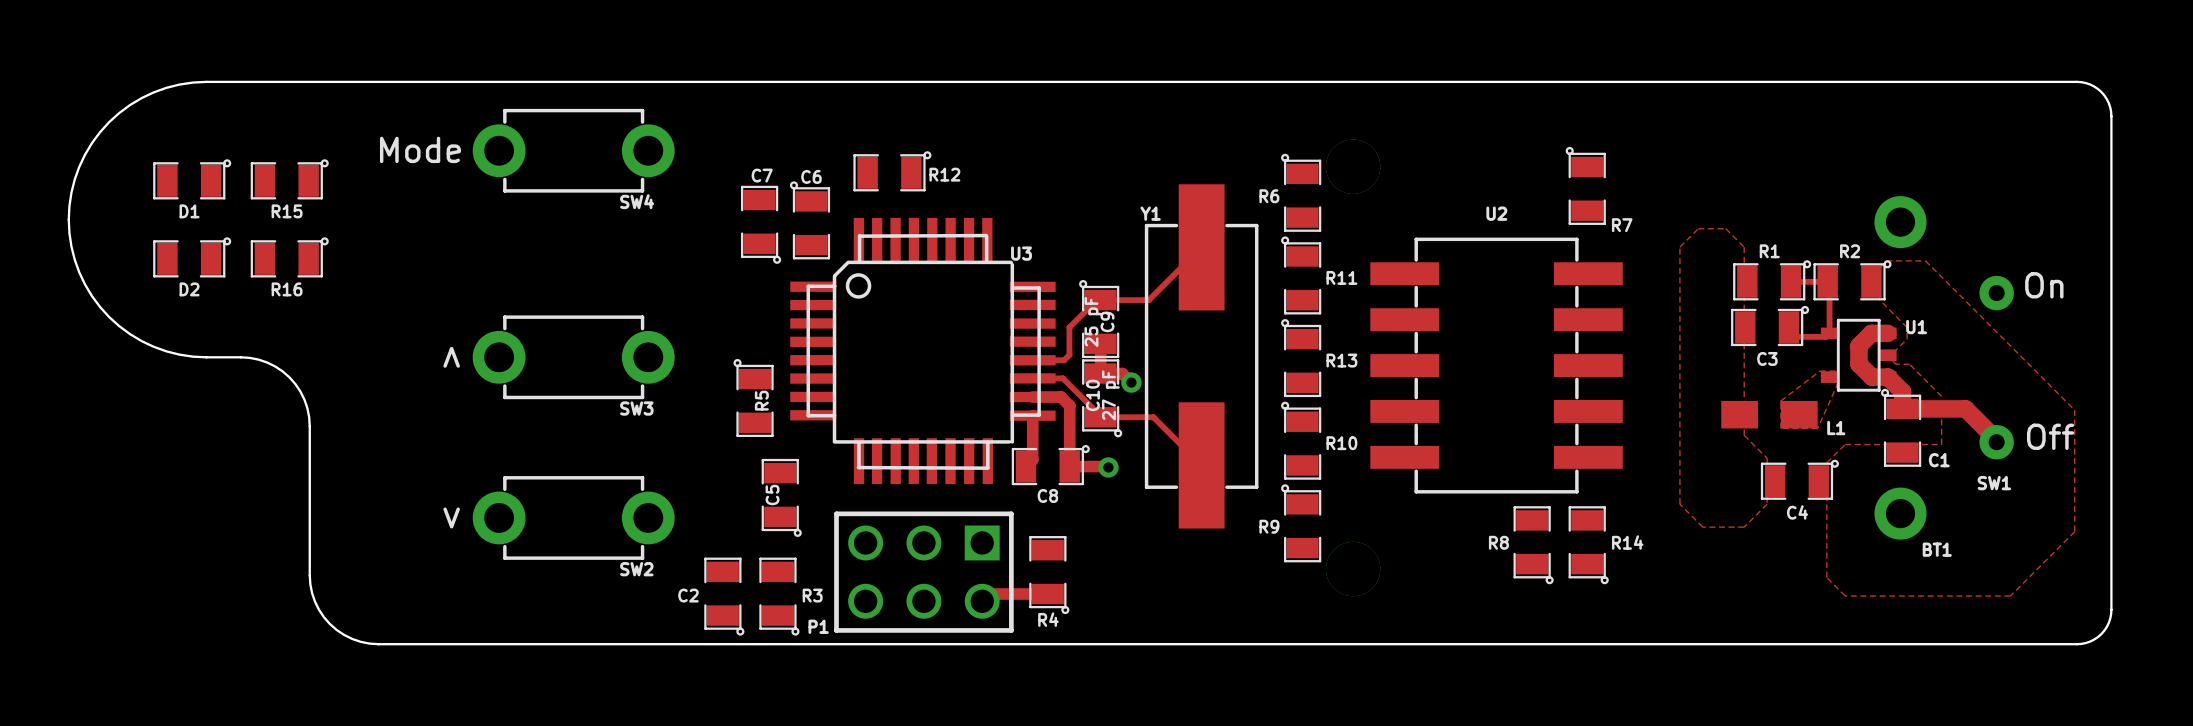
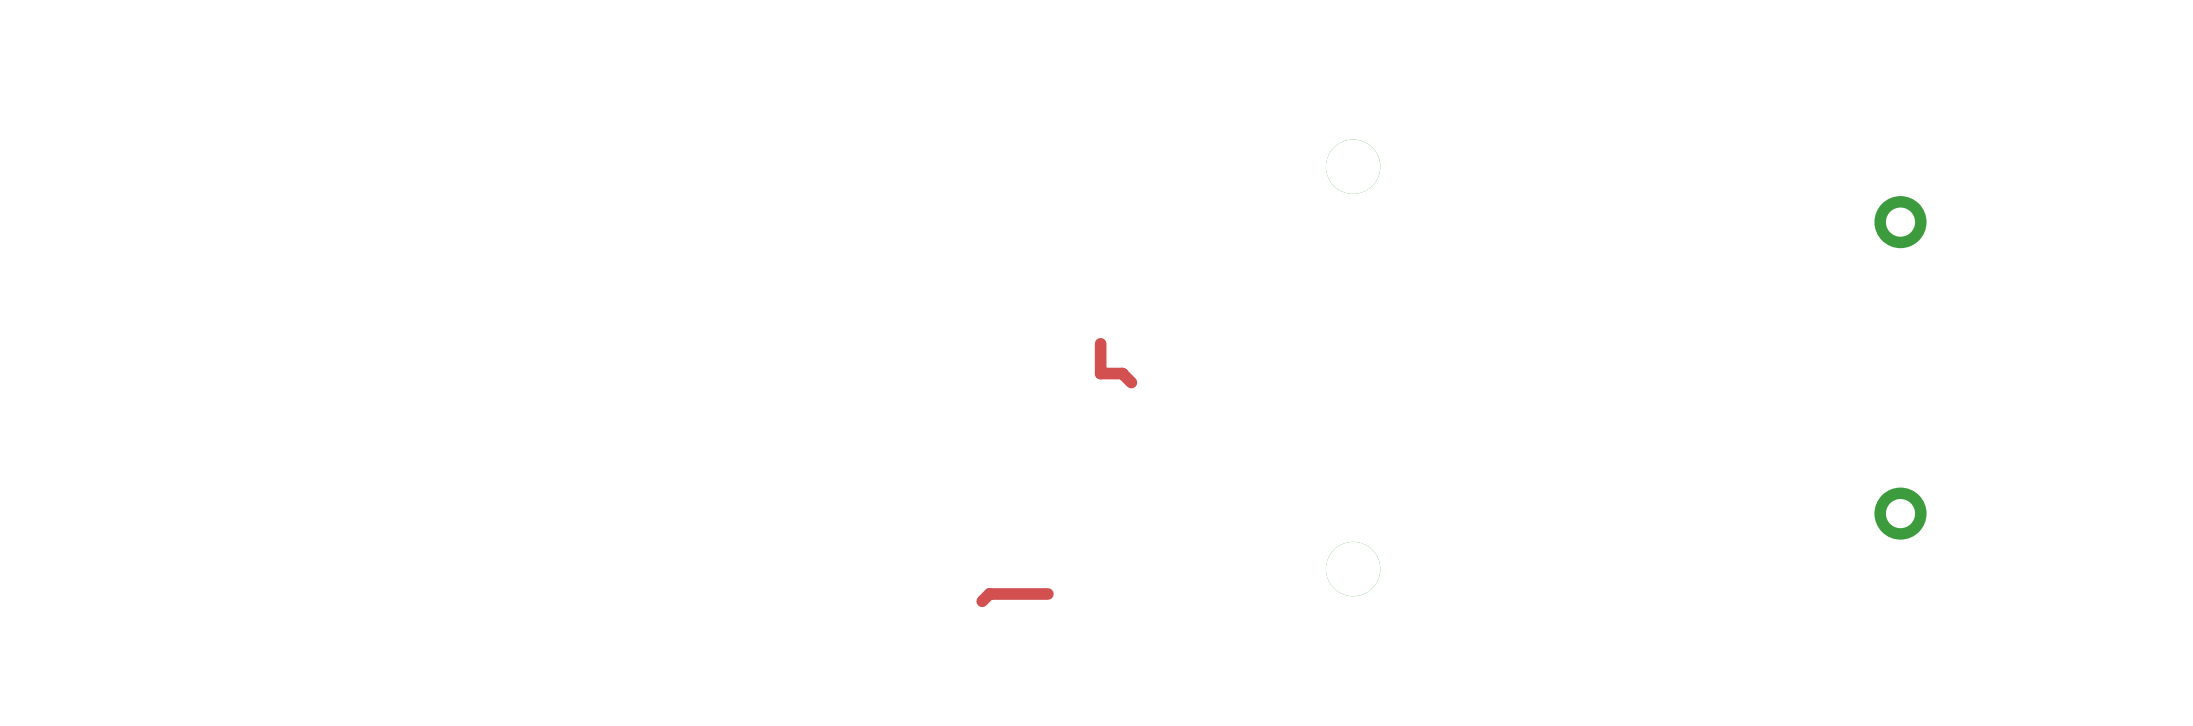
board edge: (206, 81) (2085, 83) (2094, 86) (2104, 95) (2110, 107) (2111, 116) (2110, 618) (2104, 630) (2097, 637) (2090, 641) (2076, 644) (378, 644) (360, 641) (344, 634) (329, 624) (318, 609) (312, 593) (309, 575) (309, 417) (304, 399) (295, 384) (275, 366) (258, 359) (179, 354) (141, 341) (119, 326) (100, 306) (85, 284) (74, 259) (69, 233) (69, 206) (79, 166) (91, 143) (109, 122) (141, 98) (179, 84) (206, 81) -> none
SW4: Mode (573, 150) -> none
R12: (892, 171) -> none
D1: (192, 179) -> none
R15: (289, 179) -> none
R7: (1585, 185) -> none
R6: (1301, 192) -> none
C6: (810, 220) -> none
C7: (761, 224) -> none
zone outline: (1698, 228) (1679, 247) (1679, 504) (1702, 527) (1744, 527) (1767, 504) (1767, 458) (1744, 435) (1744, 247) (1725, 228) (1698, 228) -> none
track: (1201, 247) (1148, 300) (1096, 300) (1069, 327) (1069, 355) (1064, 360) (1032, 360) -> none
D2: (192, 257) -> none
R16: (289, 257) -> none
zone outline: (1886, 260) (1879, 267) (1879, 299) (1907, 327) (1907, 338) (1893, 352) (1893, 361) (1895, 364) (1909, 364) (1941, 396) (1941, 444) (1845, 444) (1826, 462) (1826, 577) (1845, 596) (2010, 596) (2074, 531) (2074, 410) (1925, 260) (1886, 260) -> none
R11: (1301, 275) -> none
R1: (1772, 280) -> none
R2: (1852, 280) -> none
track: (1791, 281) (1827, 281) (1829, 283) (1829, 333) (1826, 336) (1791, 336) -> none
text: On (2044, 285) -> none
C9: 25 pF (1099, 319) -> none
C3: (1770, 326) -> none
track: (1887, 333) (1871, 333) (1858, 345) (1858, 364) (1871, 377) (1887, 377) (1902, 391) (1902, 408) (1965, 408) (1996, 439) (1996, 442) -> none
U3: (922, 350) -> none
U1: (1858, 355) -> none
Y1: (1201, 356) -> none
SW3: > (573, 357) -> none
R13: (1301, 358) -> none
U2: (1496, 365) -> none
SW1: (1996, 367) -> none
zone outline: (1819, 371) (1780, 400) (1780, 428) (1817, 428) (1838, 382) (1838, 371) (1819, 371) -> none
track: (1032, 378) (1062, 378) (1100, 417) (1153, 417) (1201, 465) -> none
via: (1131, 382) -> none
track: (1032, 397) (1061, 397) (1069, 405) (1069, 466) (1108, 467) -> none
R5: (753, 398) -> none
C10: 27 pF (1102, 398) -> none
L1: (1769, 414) -> none
track: (1032, 415) (1032, 459) (1026, 466) -> none
C1: (1901, 427) -> none
text: Off (2050, 436) -> none
R10: (1301, 440) -> none
C8: (1050, 465) -> none
via: (1108, 467) -> none
C4: (1799, 479) -> none
C5: (781, 497) -> none
SW2: < (573, 517) -> none
R9: (1301, 523) -> none
R8: (1533, 545) -> none
R14: (1588, 545) -> none
text: BT1 (1937, 549) -> none
P1: (923, 572) -> none
R4: (1049, 575) -> none
C2: (724, 596) -> none
R3: (779, 596) -> none

